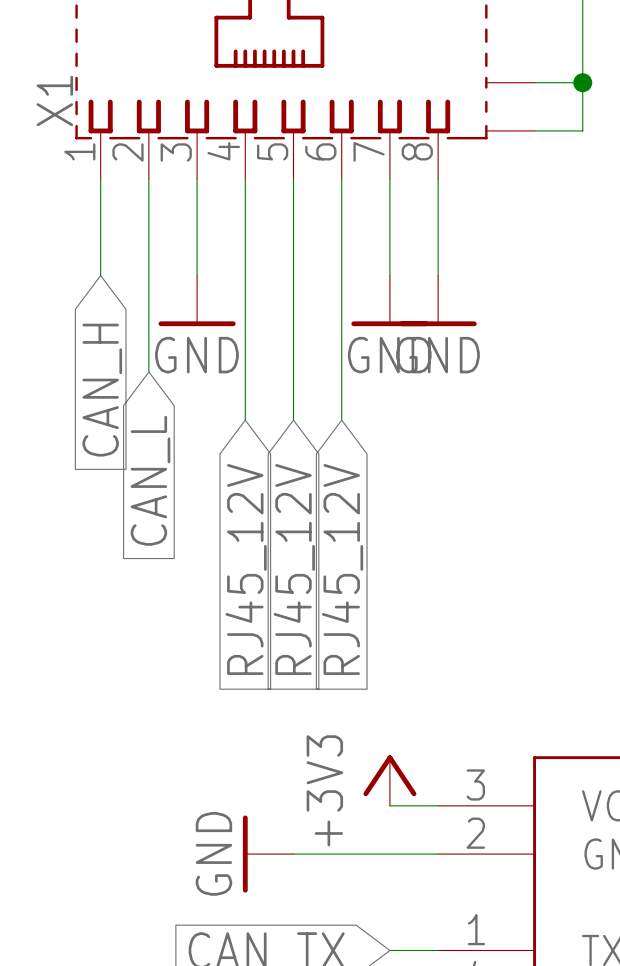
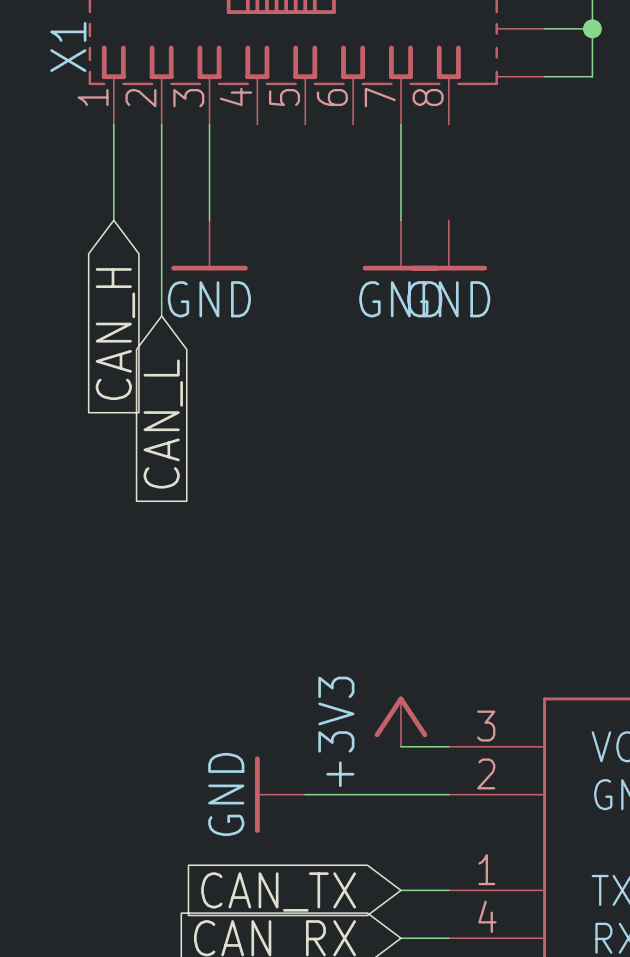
wire: (245, 179) (245, 420) -> none
wire: (293, 179) (293, 420) -> none
wire: (341, 179) (341, 420) -> none
wire: (438, 179) (438, 275) -> none
global label: RJ45_12V (246, 569) -> none
global label: RJ45_12V (294, 569) -> none
global label: RJ45_12V (342, 569) -> none

